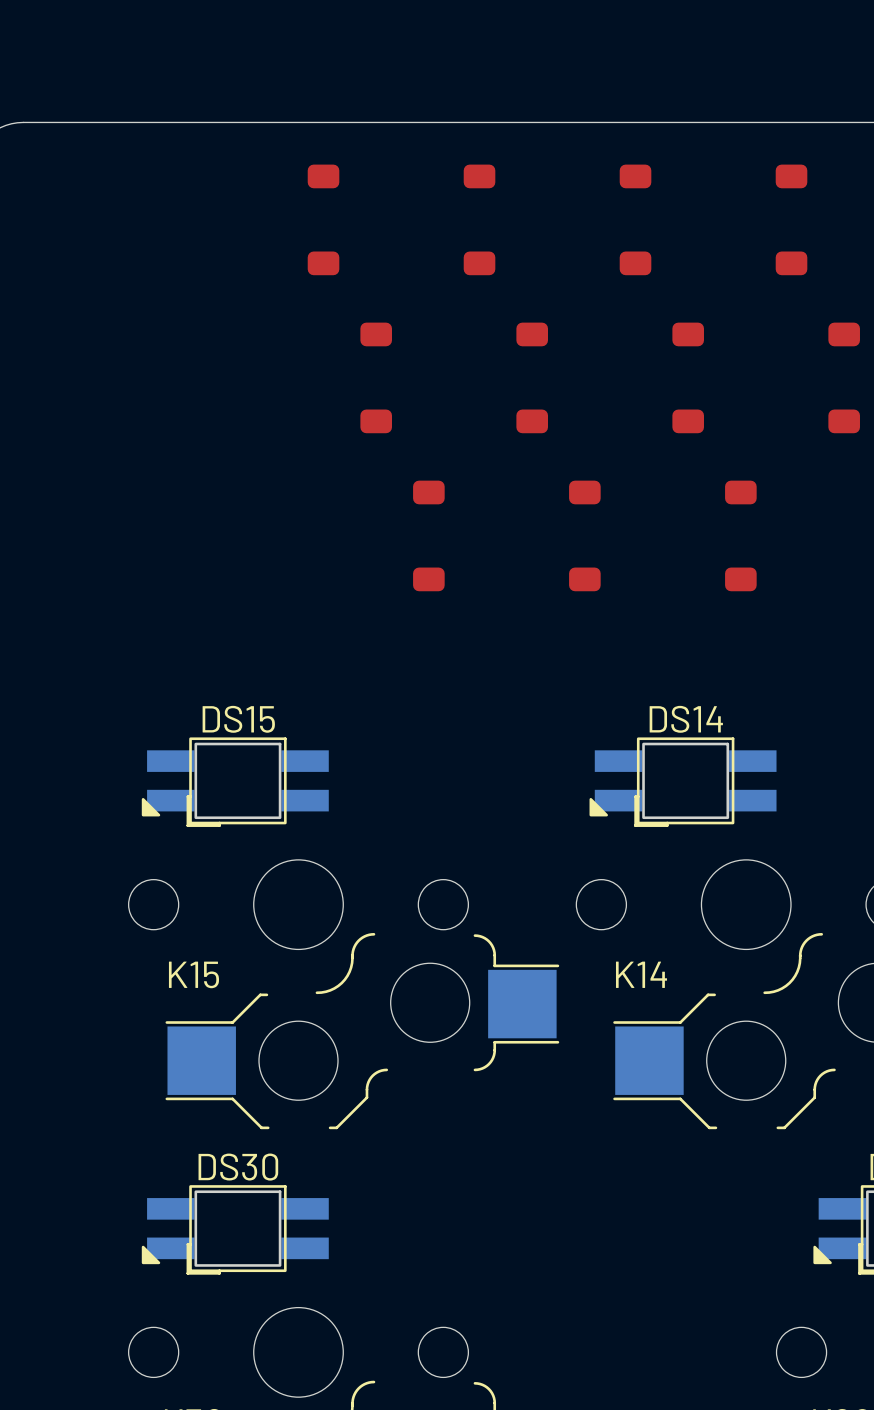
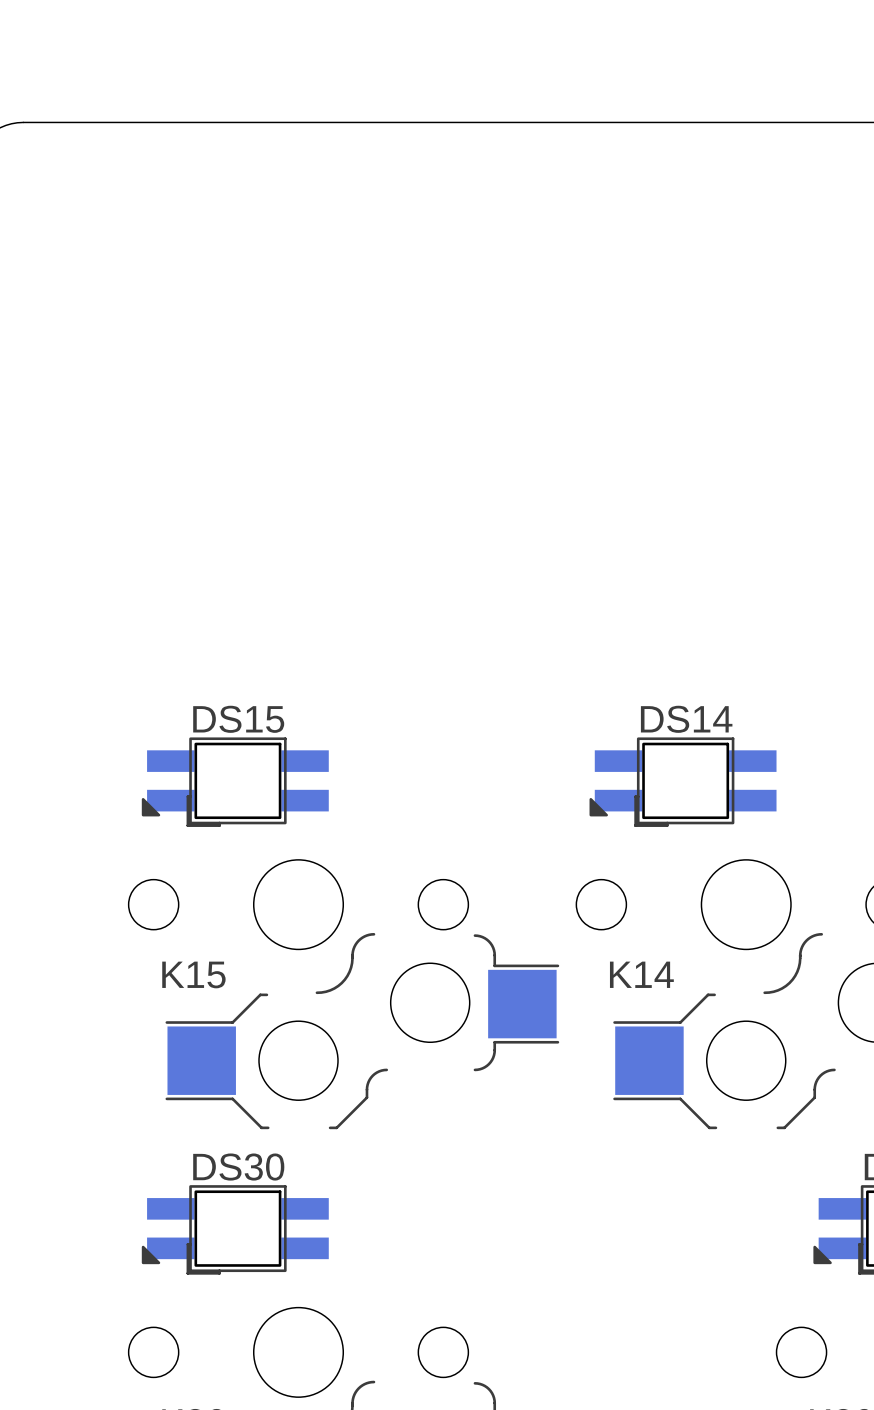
part: (323, 219) -> none
part: (479, 219) -> none
part: (635, 219) -> none
part: (791, 219) -> none
part: (376, 377) -> none
part: (532, 377) -> none
part: (688, 377) -> none
part: (844, 377) -> none
part: (428, 535) -> none
part: (584, 535) -> none
part: (740, 535) -> none

